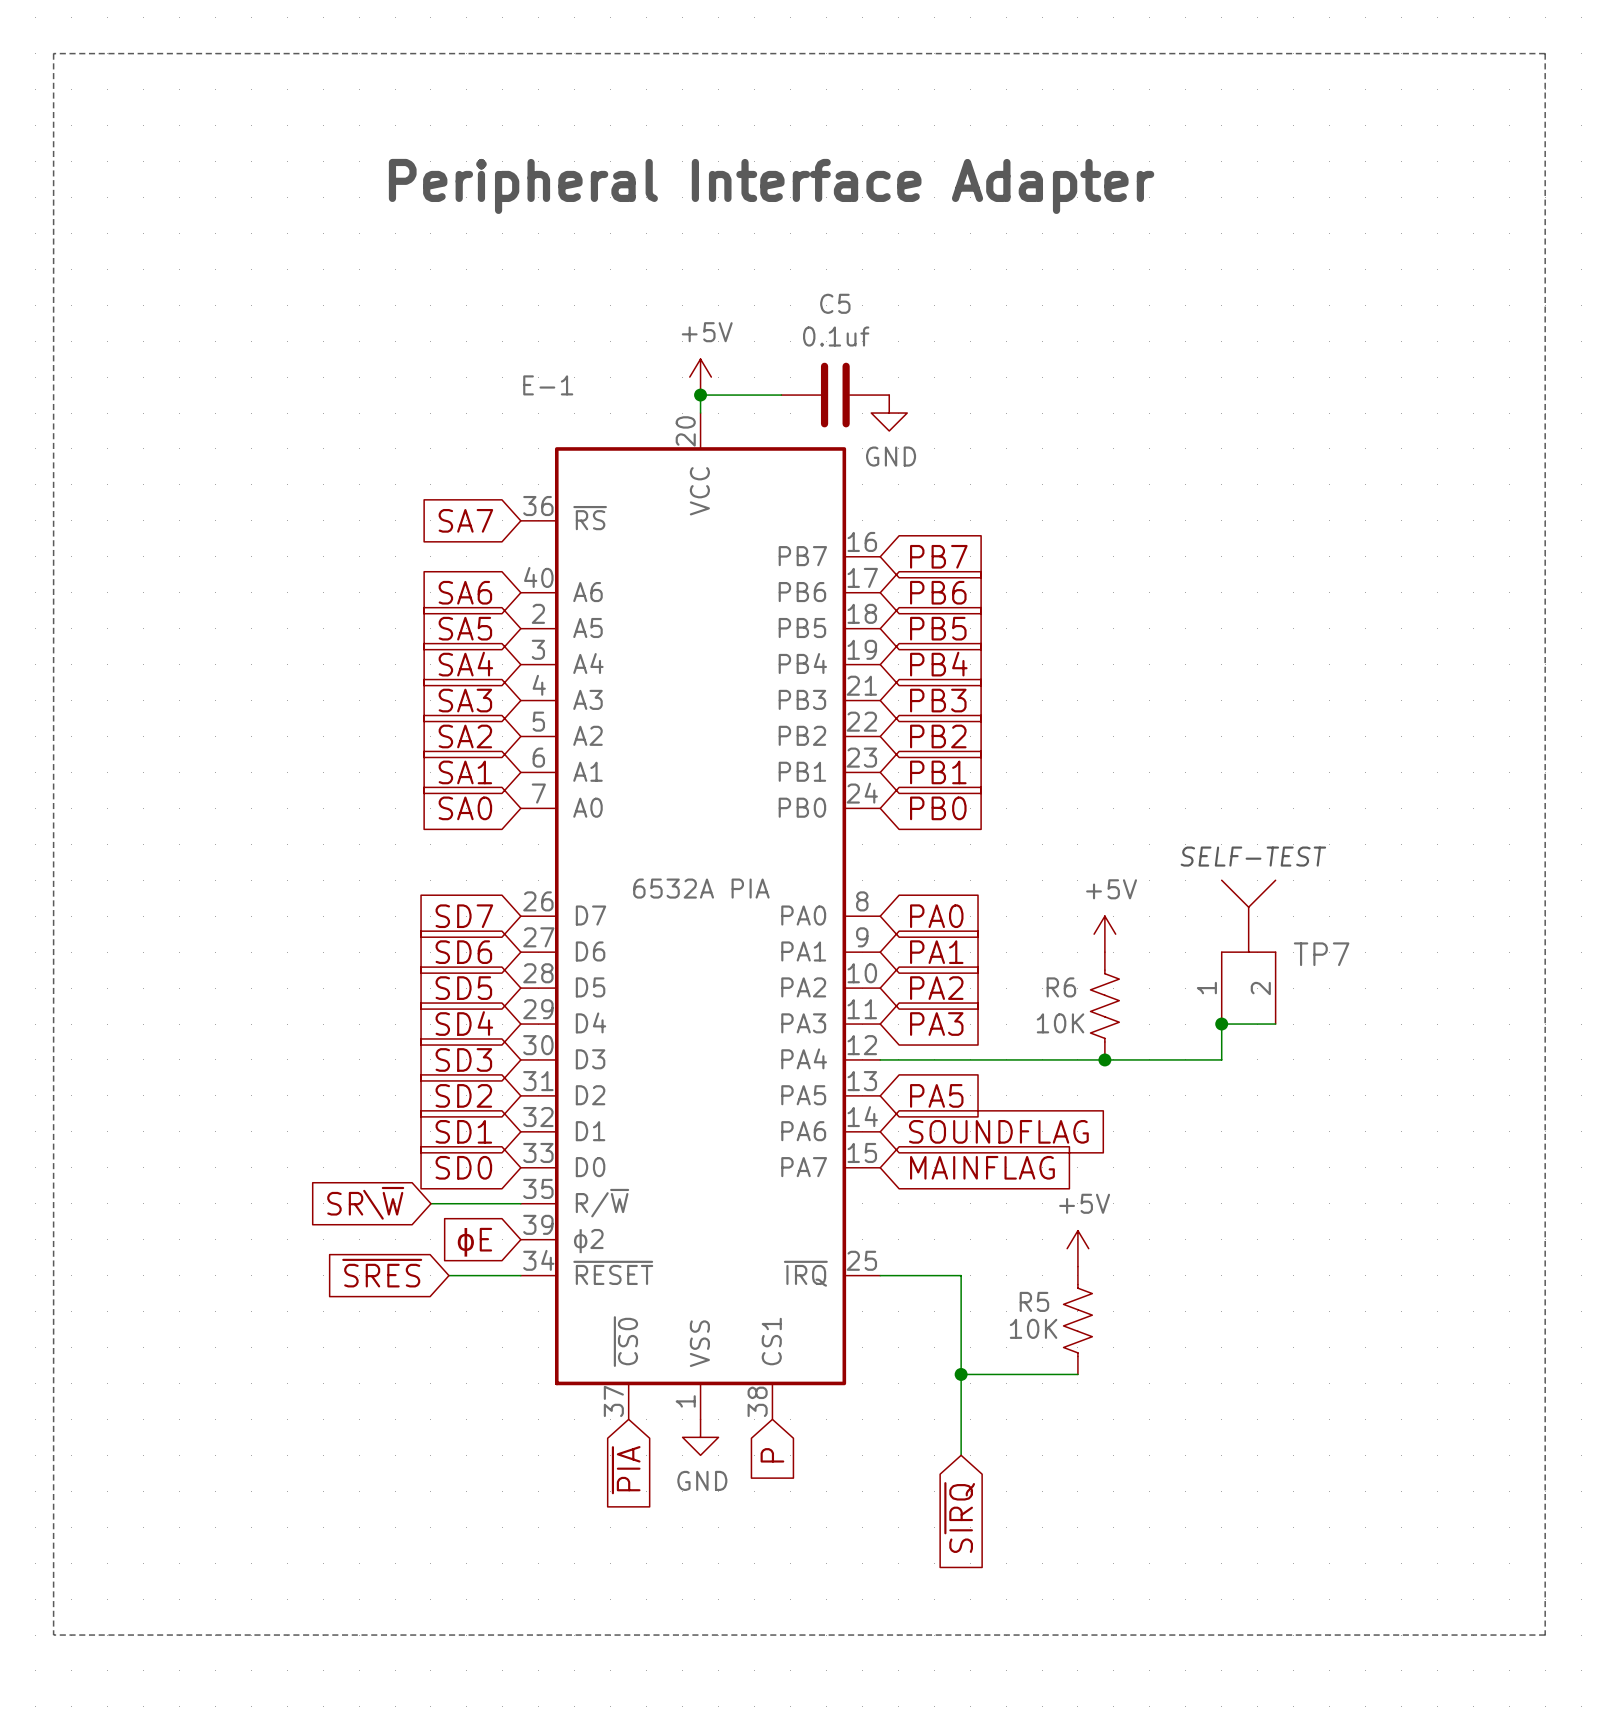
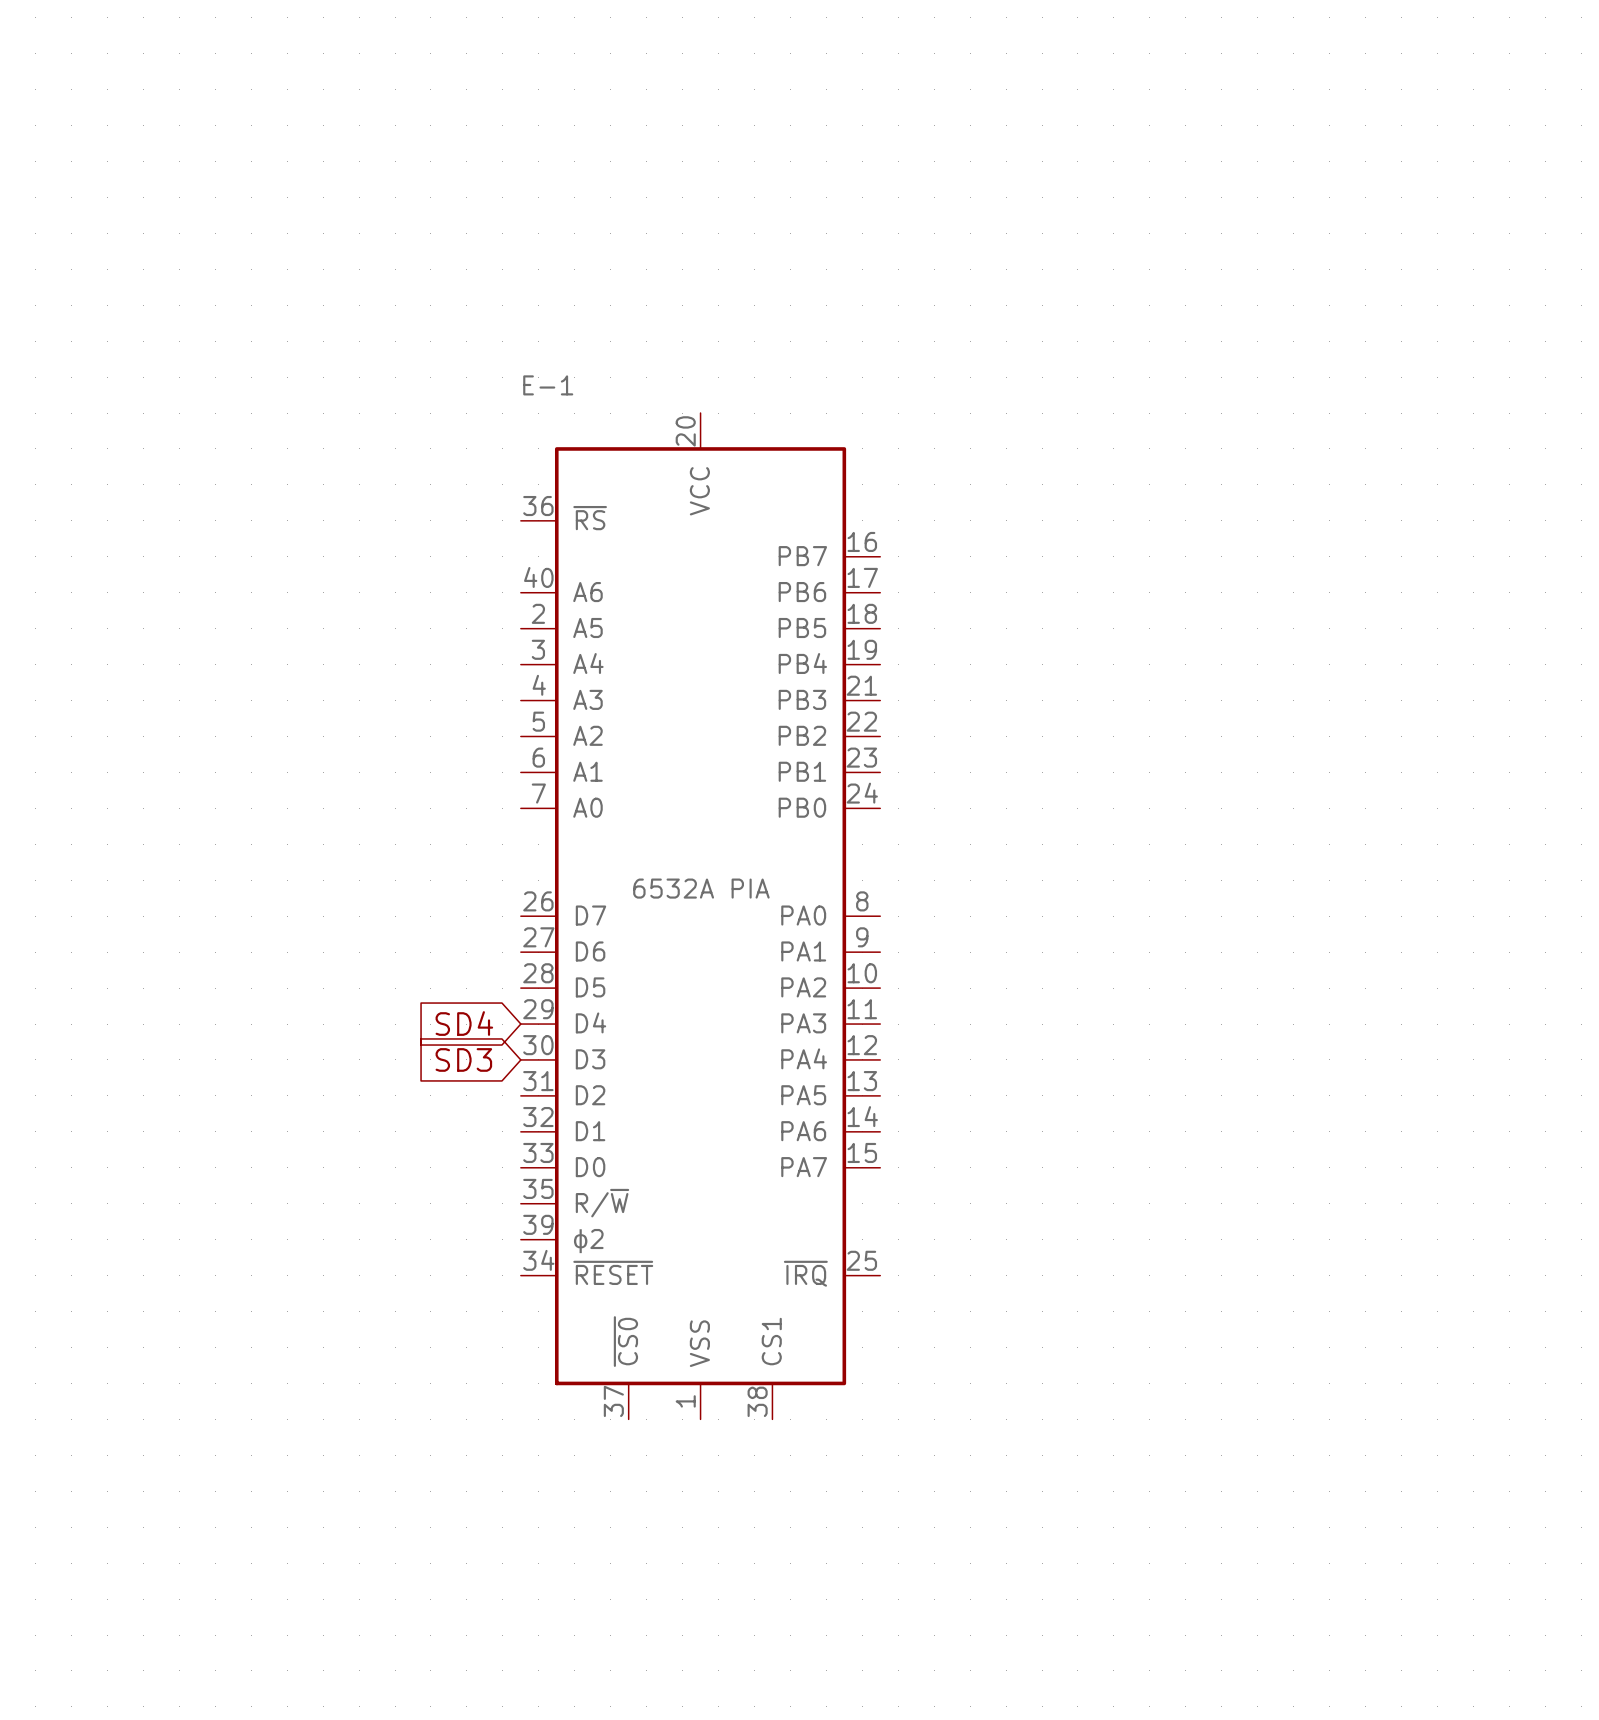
line: (53, 53) (1545, 53) (1545, 1635) (53, 1635) (53, 53) -> none
text: Peripheral Interface Adapter (771, 186) -> none
power symbol: +5V (700, 377) -> none
junction: (700, 395) -> none
wire: (781, 395) (700, 395) (700, 413) -> none
C5: 0.1uf (835, 395) -> none
power symbol: GND (889, 413) -> none
global label: SA7 (465, 520) -> none
global label: PB7 (938, 556) -> none
global label: SA6 (465, 592) -> none
global label: PB6 (938, 592) -> none
global label: SA5 (465, 628) -> none
global label: PB5 (938, 628) -> none
global label: SA4 (465, 664) -> none
global label: PB4 (938, 664) -> none
global label: SA3 (465, 700) -> none
global label: PB3 (938, 700) -> none
global label: SA2 (465, 736) -> none
global label: PB2 (938, 736) -> none
global label: SA1 (465, 772) -> none
global label: PB1 (938, 772) -> none
global label: SA0 (465, 808) -> none
global label: PB0 (938, 808) -> none
text: SELF-TEST (1253, 856) -> none
global label: SD7 (464, 916) -> none
global label: PA0 (936, 916) -> none
power symbol: +5V (1104, 934) -> none
global label: SD6 (463, 952) -> none
global label: PA1 (936, 952) -> none
TP7: (1248, 952) -> none
global label: SD5 (463, 988) -> none
global label: PA2 (936, 988) -> none
R6: 10K (1104, 1006) -> none
global label: PA3 (936, 1024) -> none
junction: (1221, 1024) -> none
wire: (1275, 1024) (1221, 1024) (1221, 1059) (880, 1059) -> none
junction: (1104, 1059) -> none
global label: SD2 (463, 1095) -> none
global label: PA5 (936, 1095) -> none
global label: SD1 (463, 1131) -> none
global label: SOUNDFLAG (998, 1131) -> none
global label: SD0 (463, 1167) -> none
global label: MAINFLAG (982, 1167) -> none
global label: SR\~{W} (365, 1203) -> none
wire: (430, 1203) (520, 1203) -> none
global label: ɸE (474, 1242) -> none
power symbol: +5V (1077, 1248) -> none
global label: ~{SRES} (382, 1273) -> none
wire: (448, 1275) (520, 1275) -> none
wire: (880, 1275) (961, 1275) (961, 1455) -> none
R5: 10K (1077, 1320) -> none
wire: (961, 1374) (1077, 1374) -> none
junction: (961, 1374) -> none
power symbol: GND (700, 1437) -> none
global label: P (772, 1455) -> none
global label: ~{PIA} (626, 1470) -> none
global label: S~{IRQ} (959, 1517) -> none

